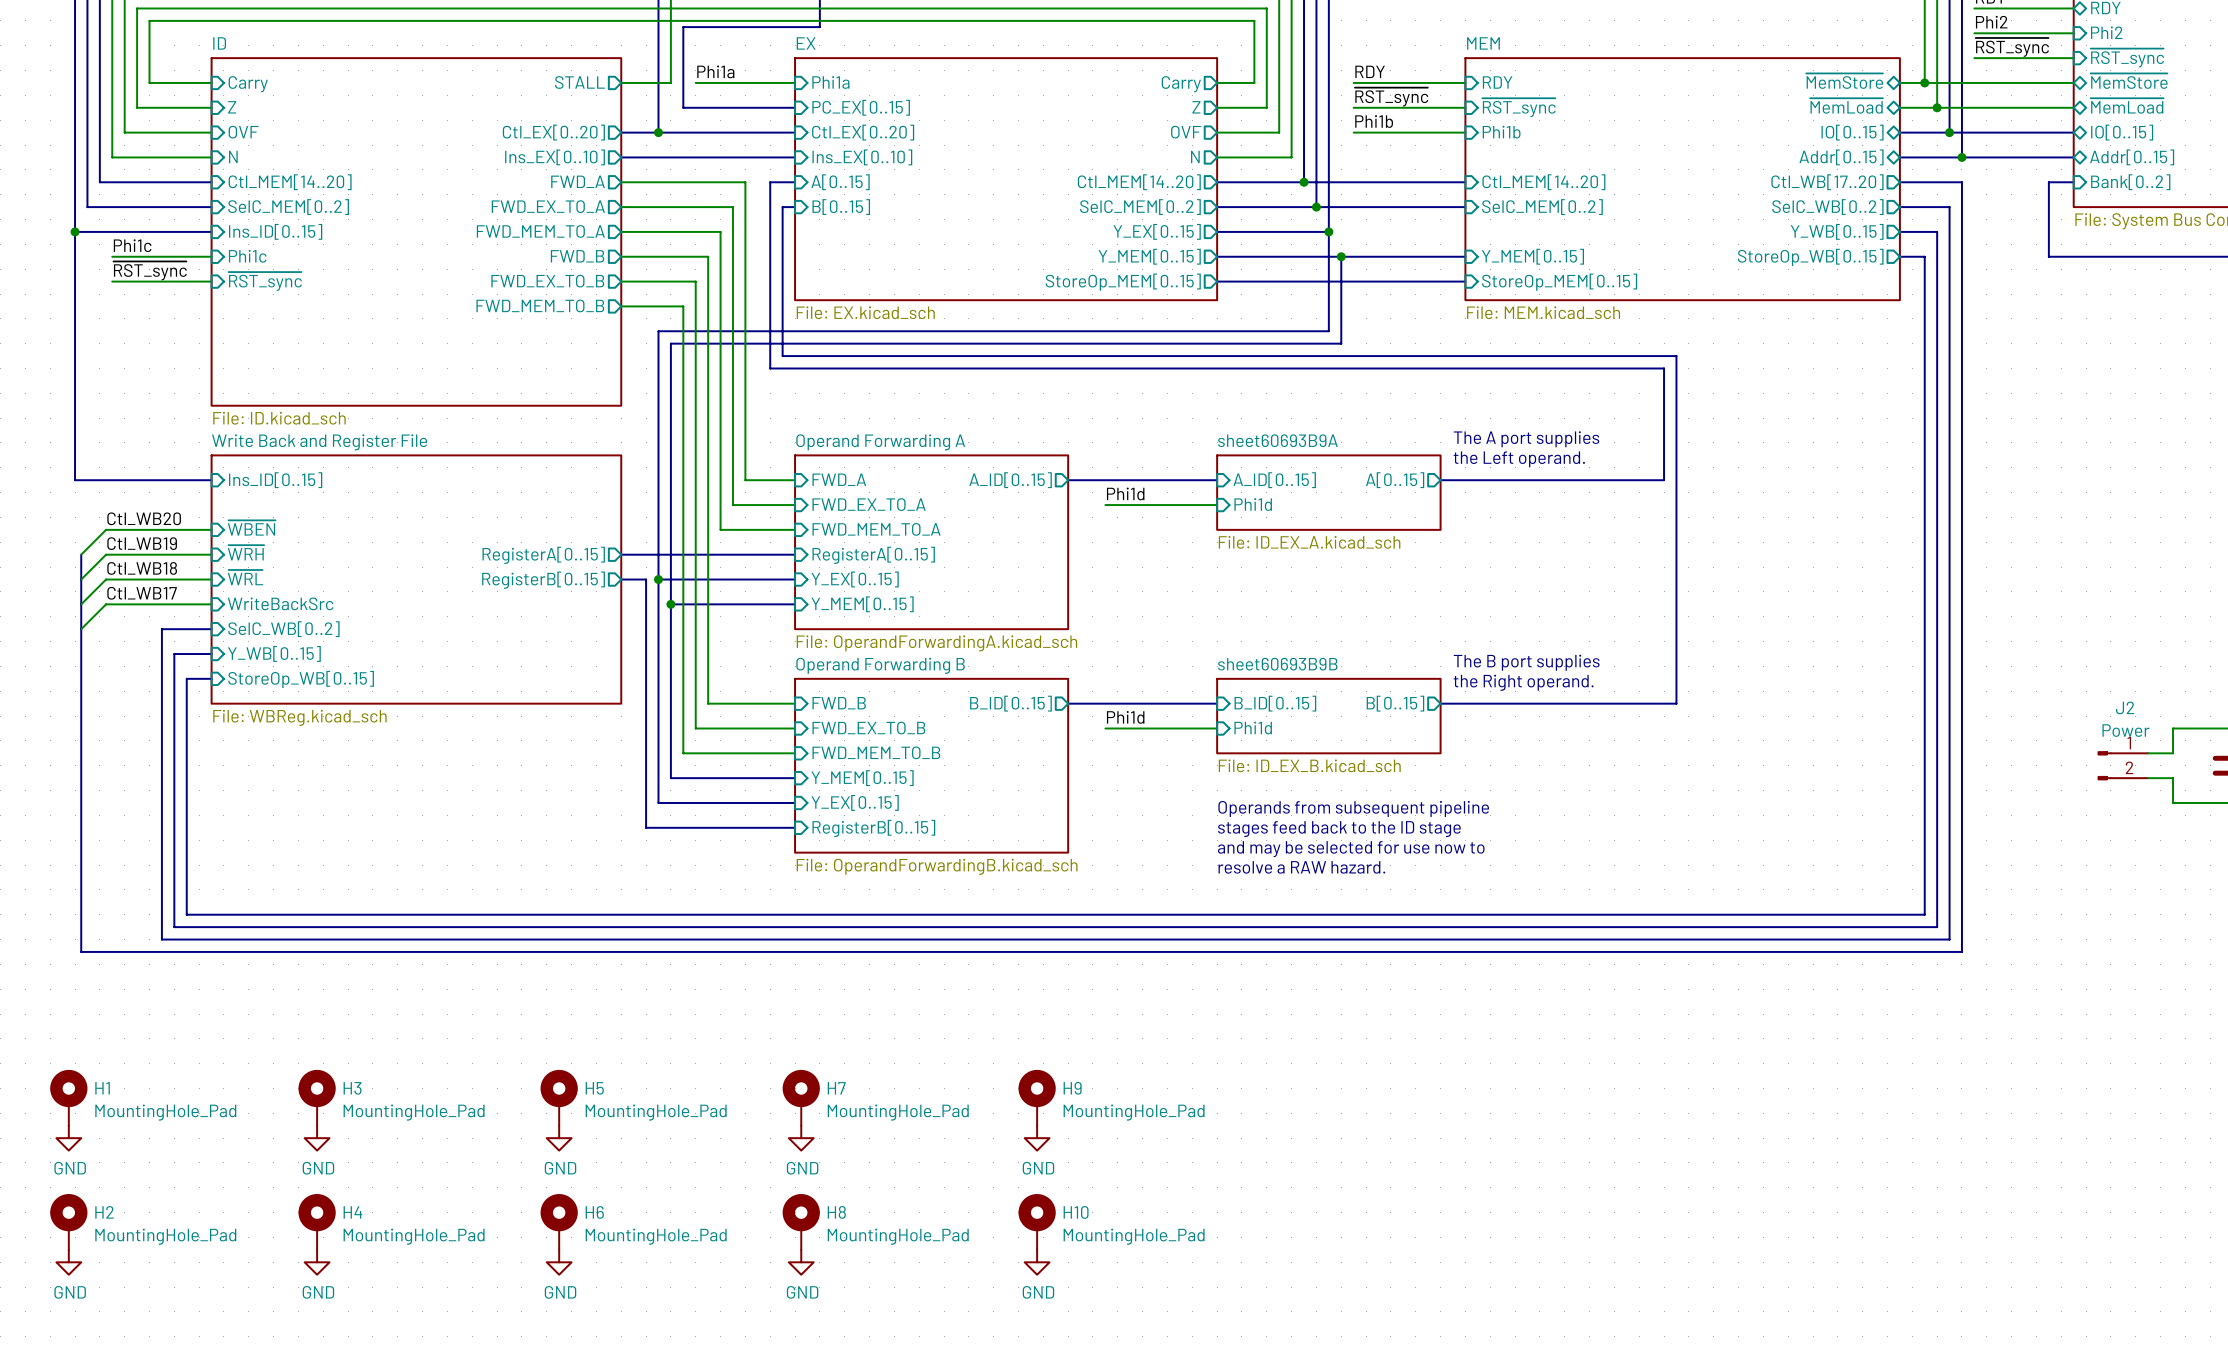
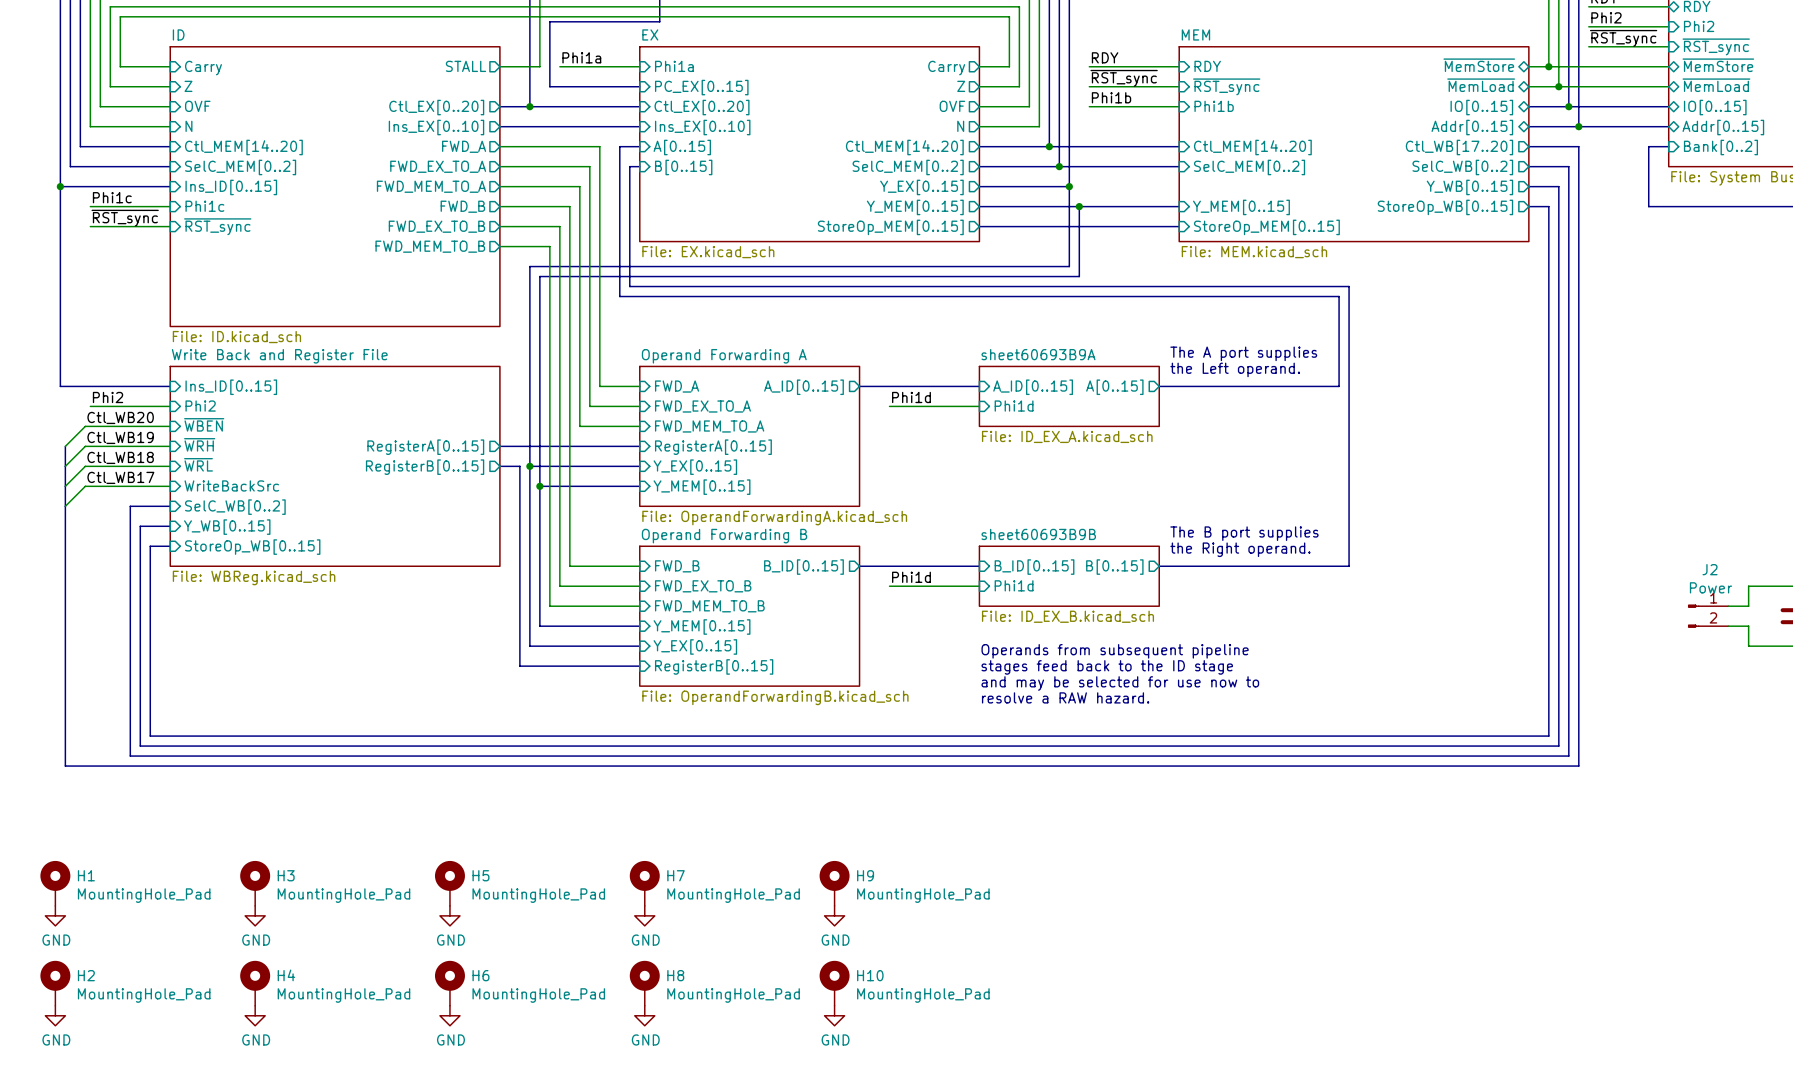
label: none -> Phi2 (108, 397)
sheet pin: none -> Phi2 (200, 406)
wire: none -> (90, 406) (170, 406)

